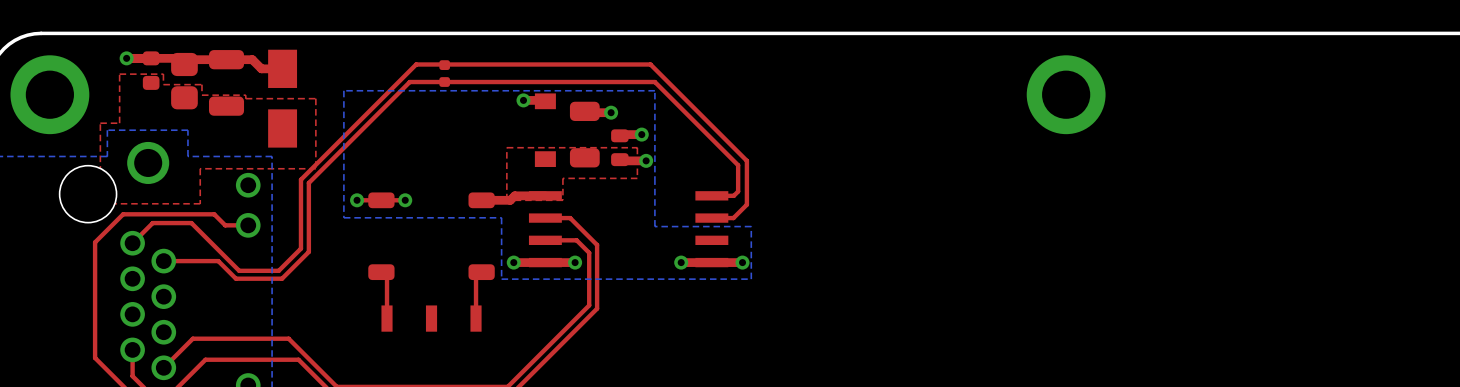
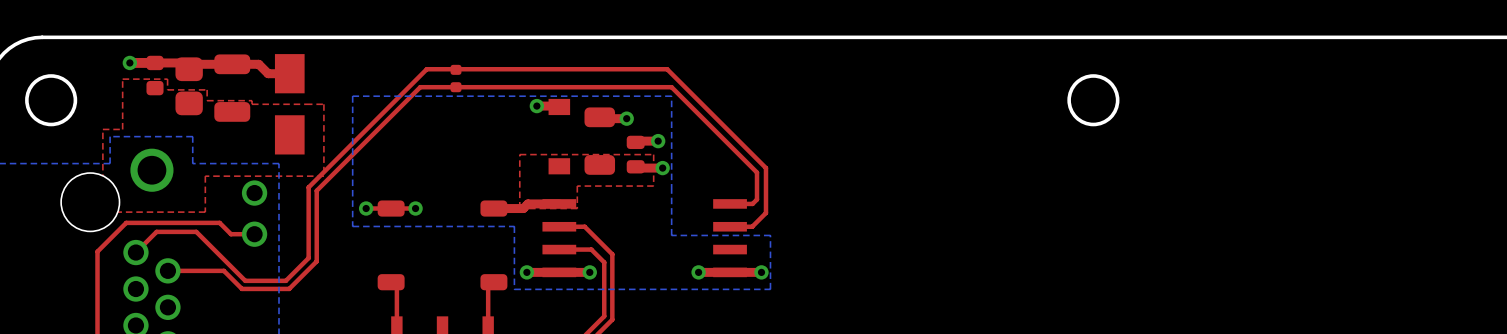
round board edge: none -> [25, 74, 78, 127]
round board edge: none -> [1067, 74, 1120, 127]
part: (49, 94) -> none
part: (1066, 94) -> none

